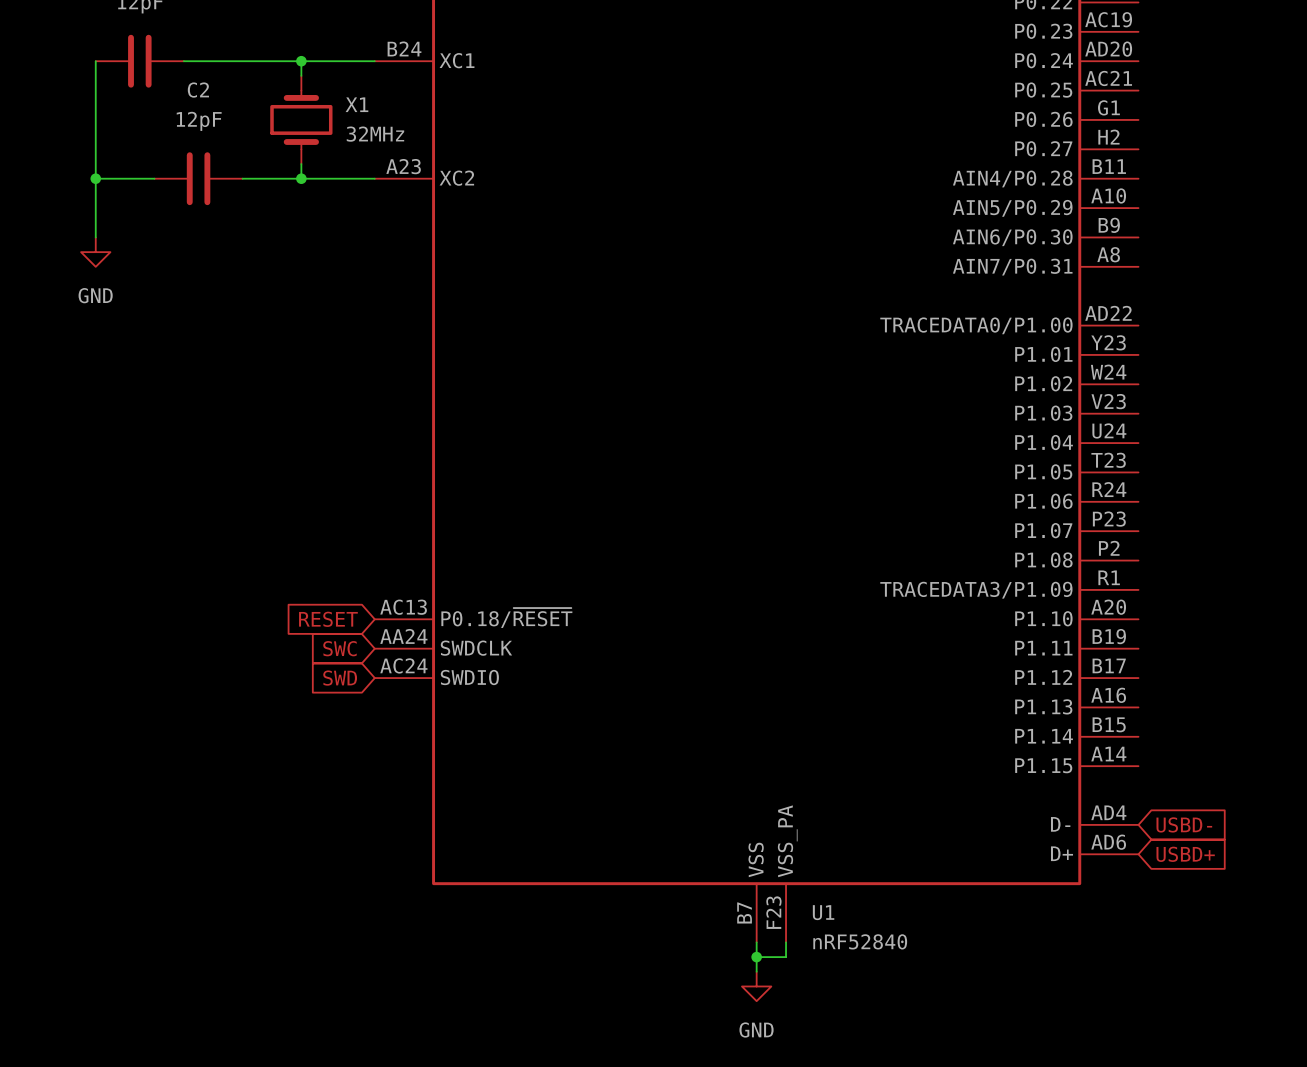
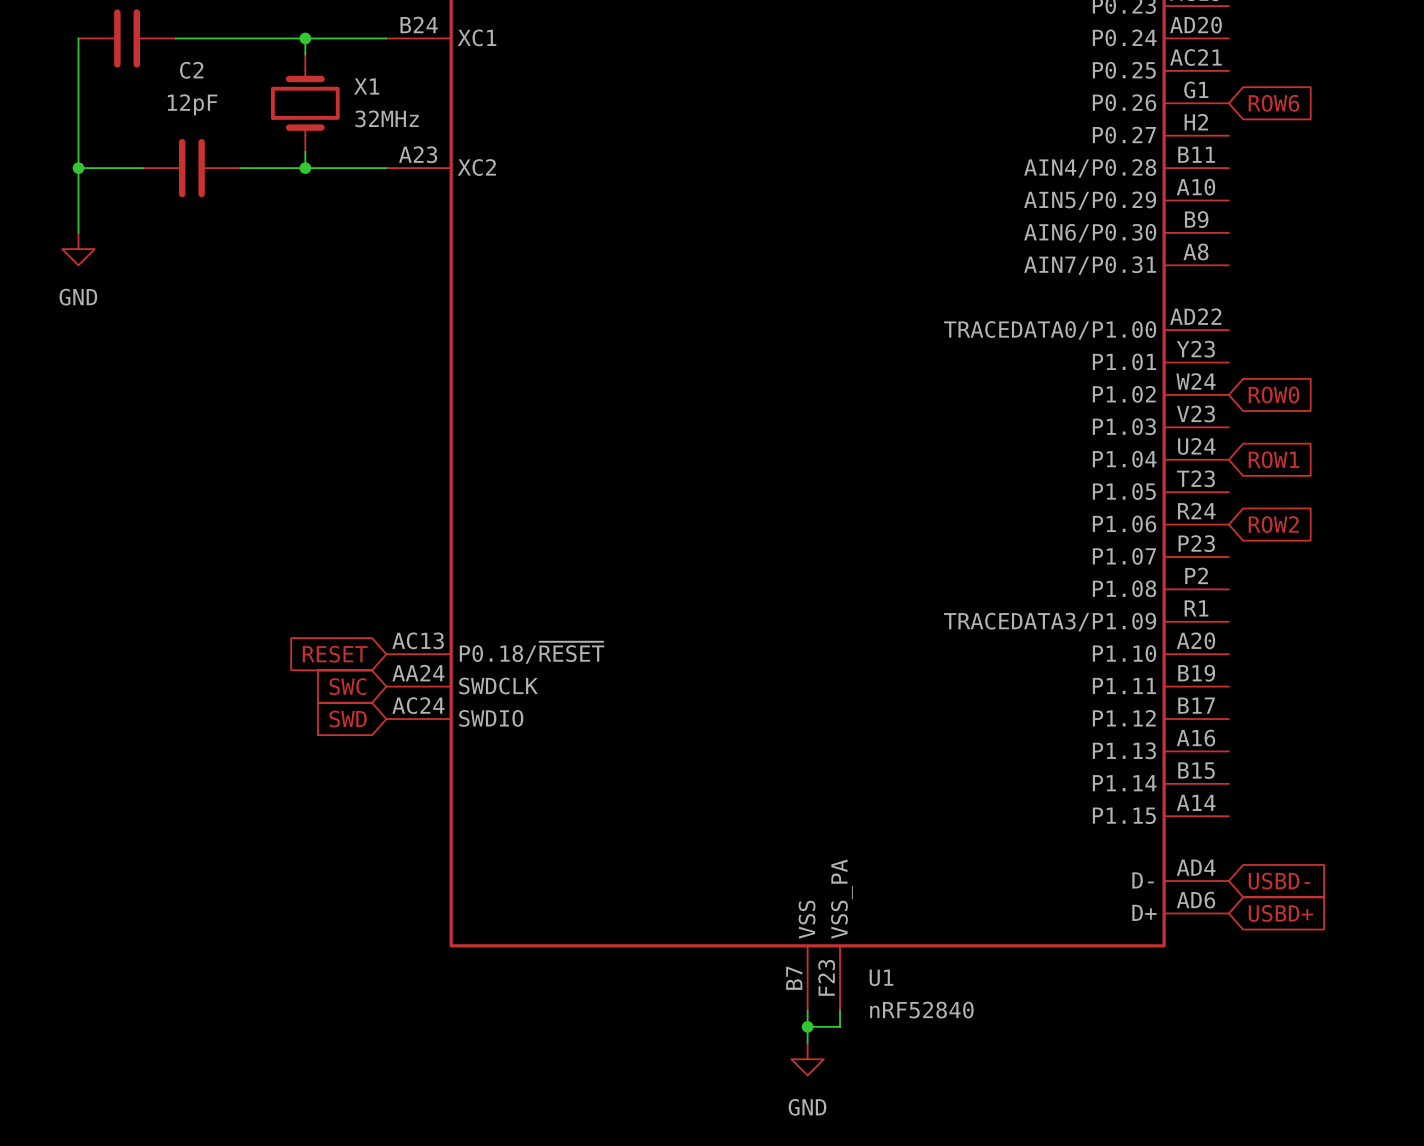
global label: none -> ROW6 (1273, 103)
global label: none -> ROW0 (1273, 394)
global label: none -> ROW1 (1273, 459)
global label: none -> ROW2 (1273, 524)

